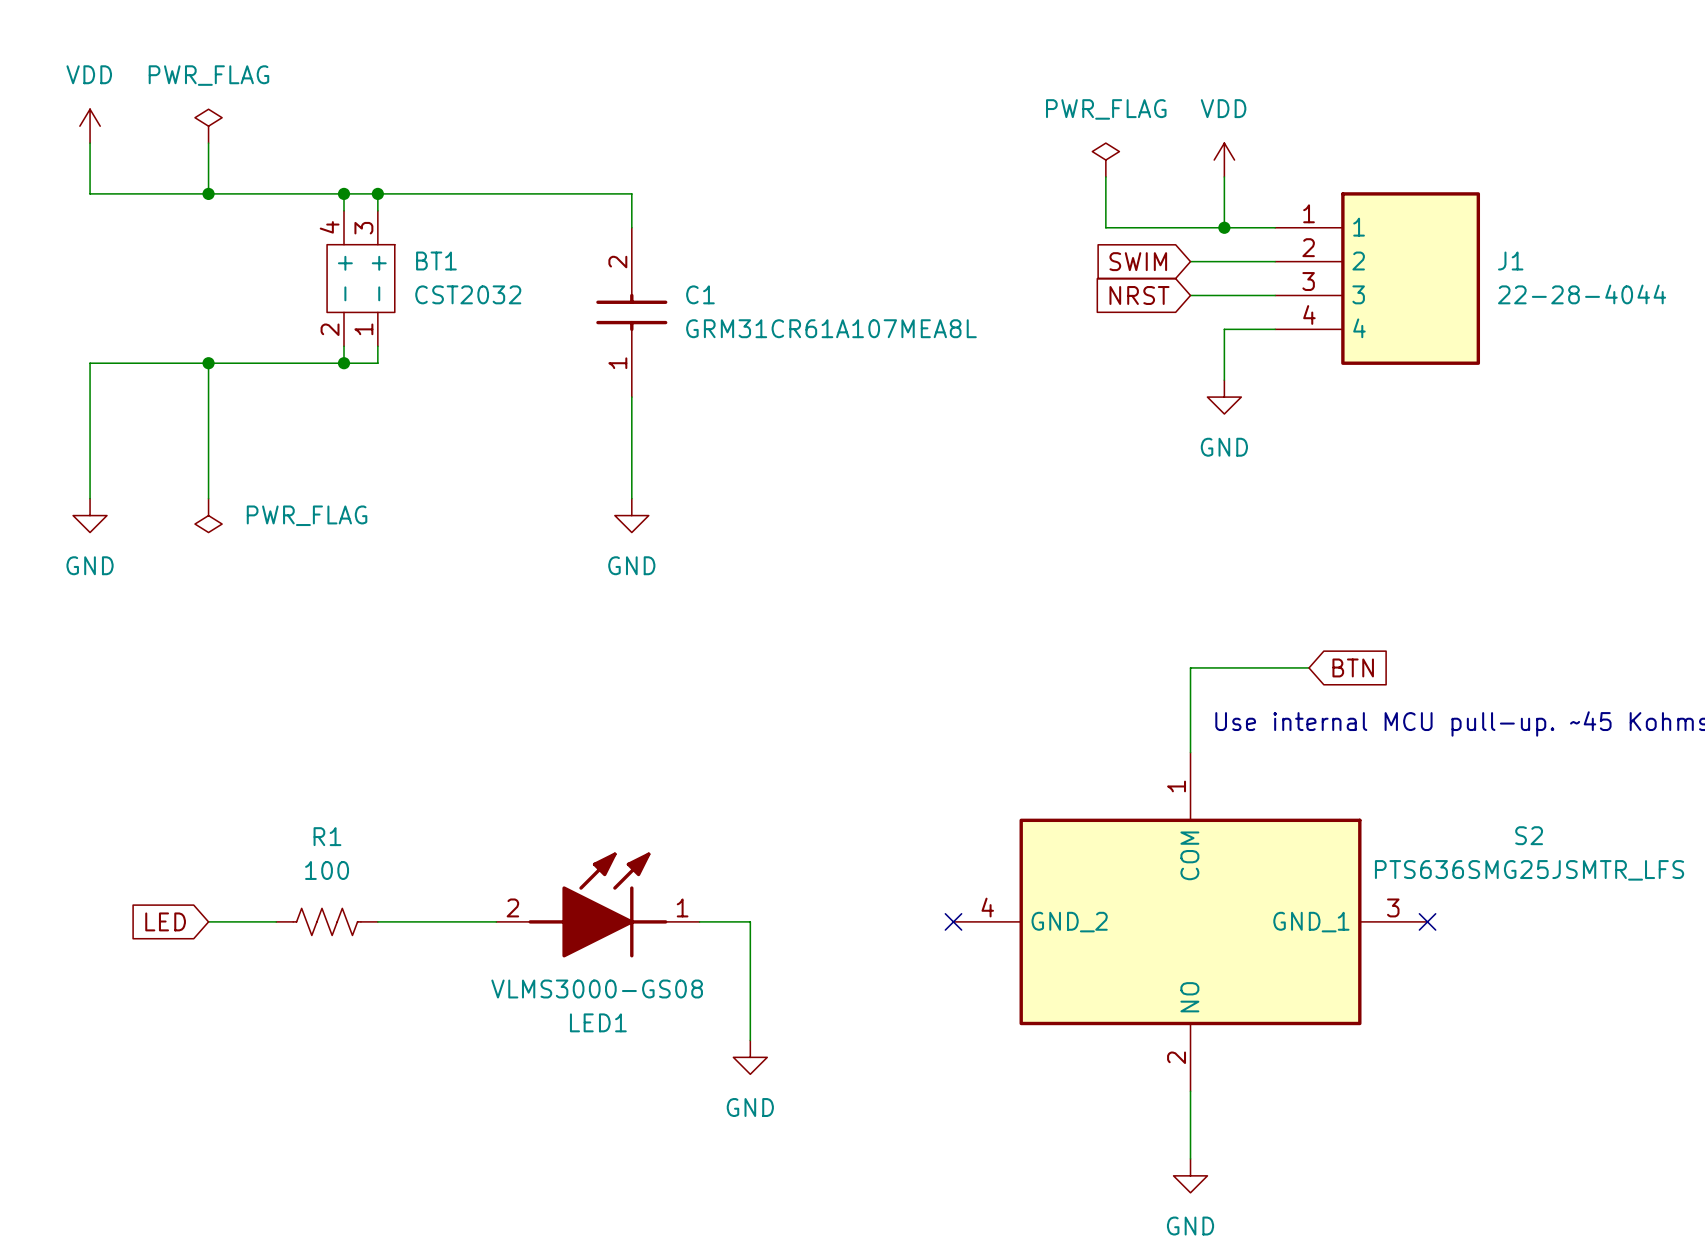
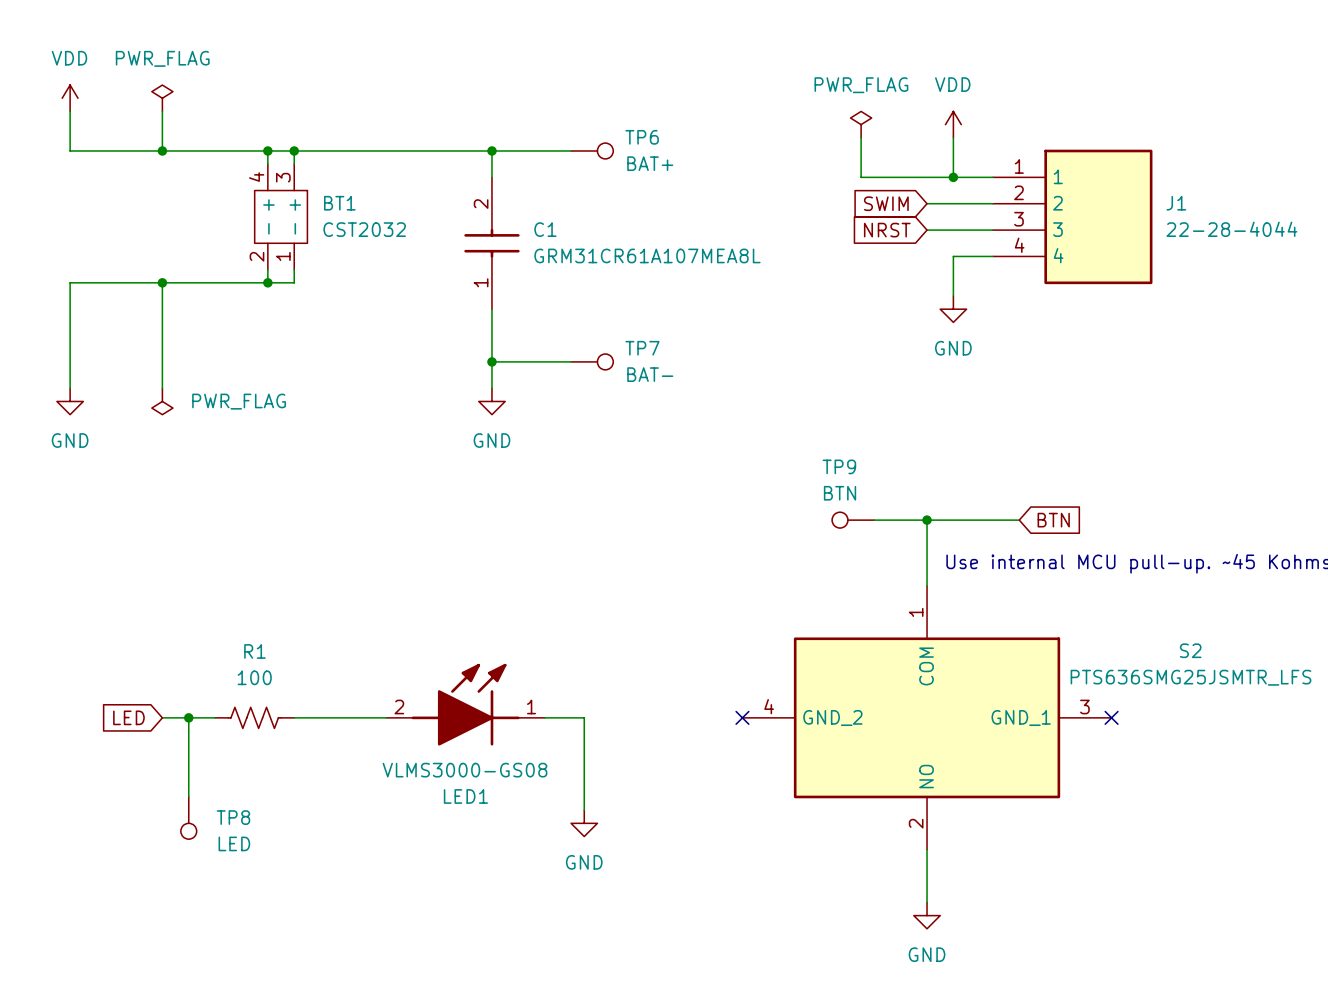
wire: none -> (491, 150) (571, 150)
junction: none -> (491, 150)
TP6: none -> BAT+ (592, 150)
wire: none -> (491, 361) (571, 361)
junction: none -> (491, 361)
TP7: none -> BAT- (592, 361)
TP9: none -> BTN (853, 520)
wire: none -> (874, 520) (927, 520)
junction: none -> (927, 520)
wire: none -> (188, 717) (188, 796)
junction: none -> (188, 717)
TP8: none -> LED (188, 818)

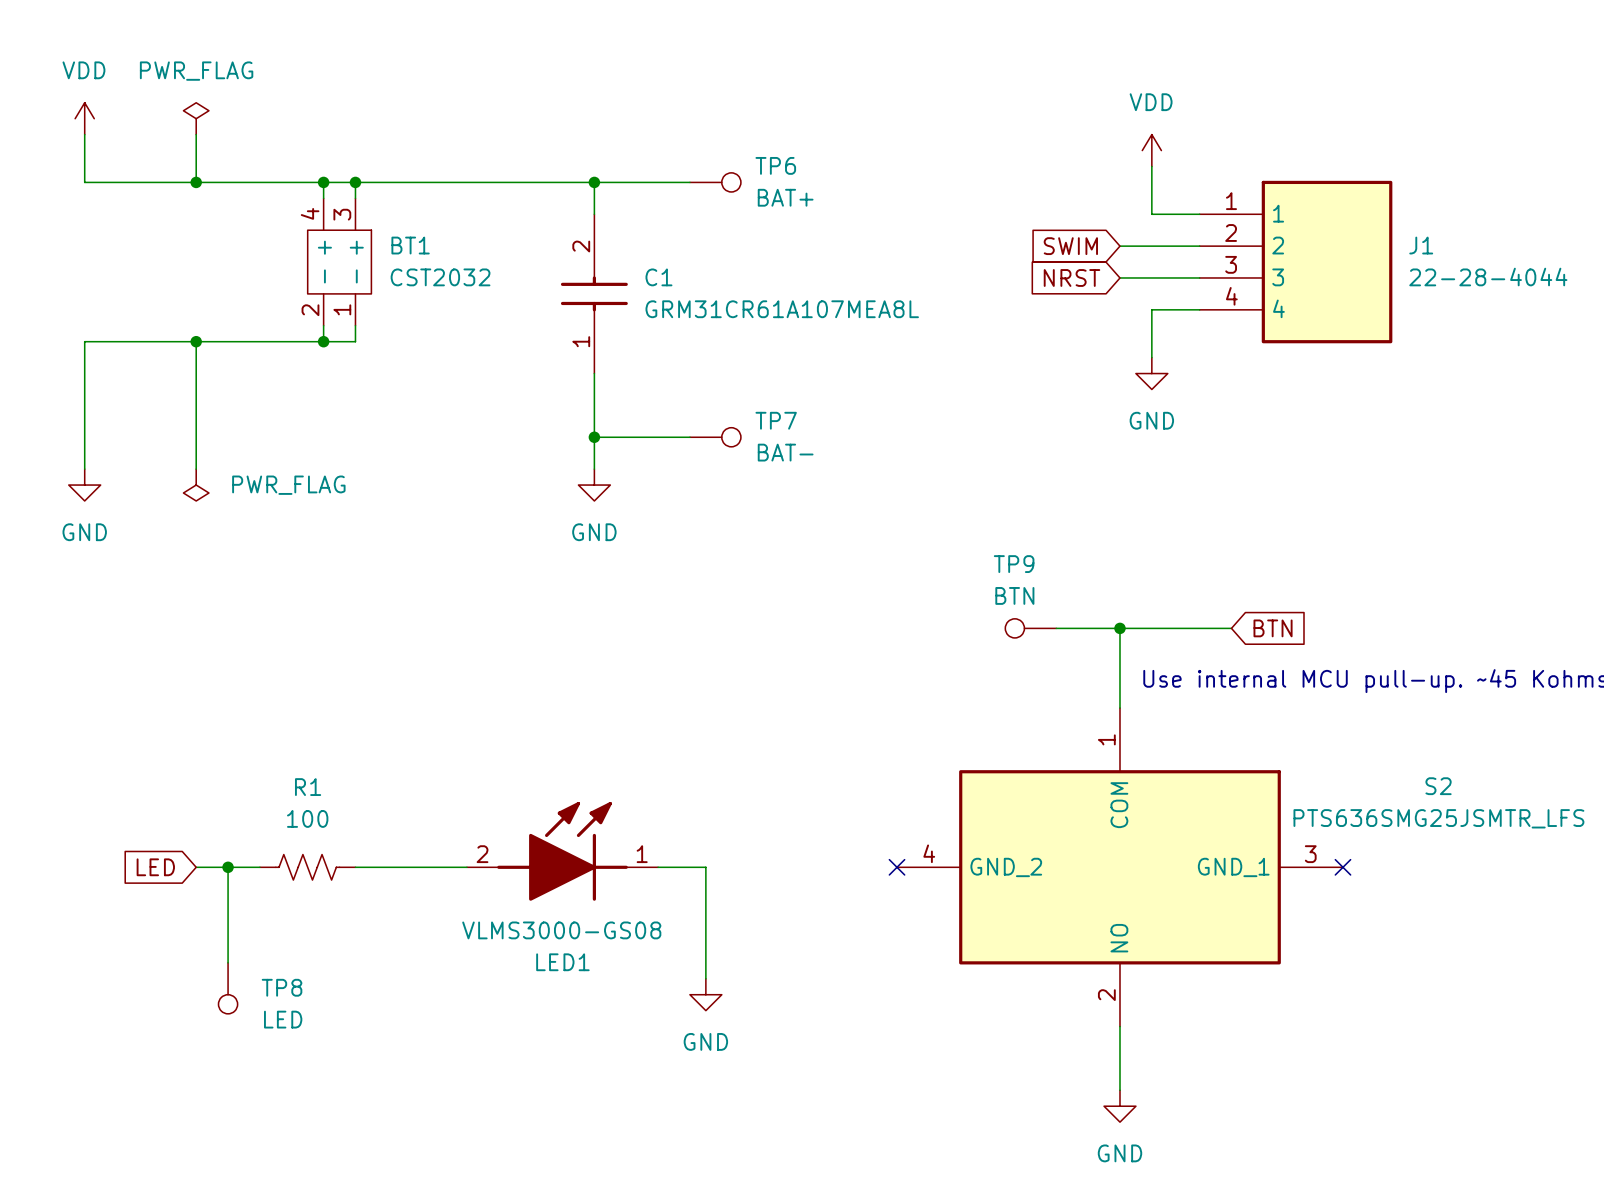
power symbol: PWR_FLAG (861, 124) -> none
wire: (861, 137) (861, 177) (953, 177) -> none
junction: (953, 177) -> none

